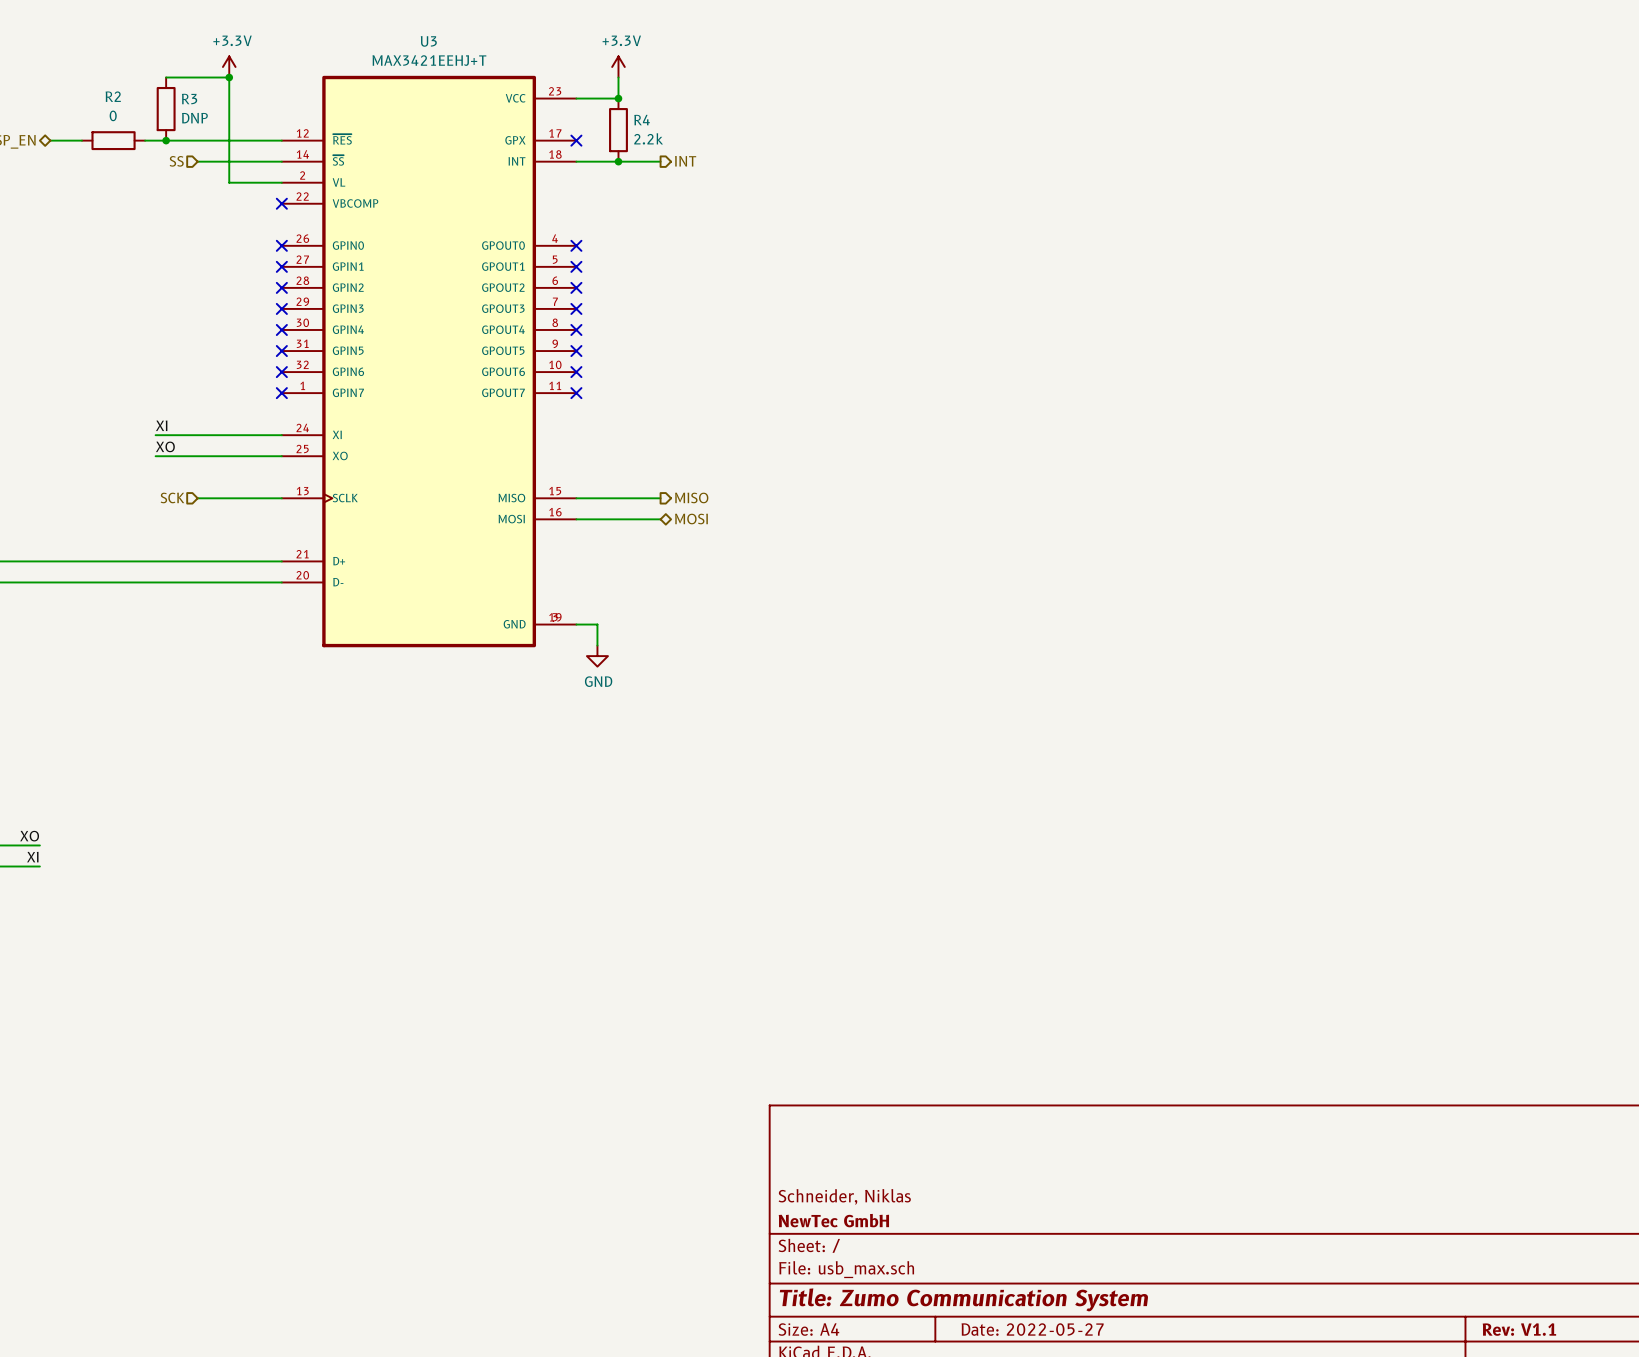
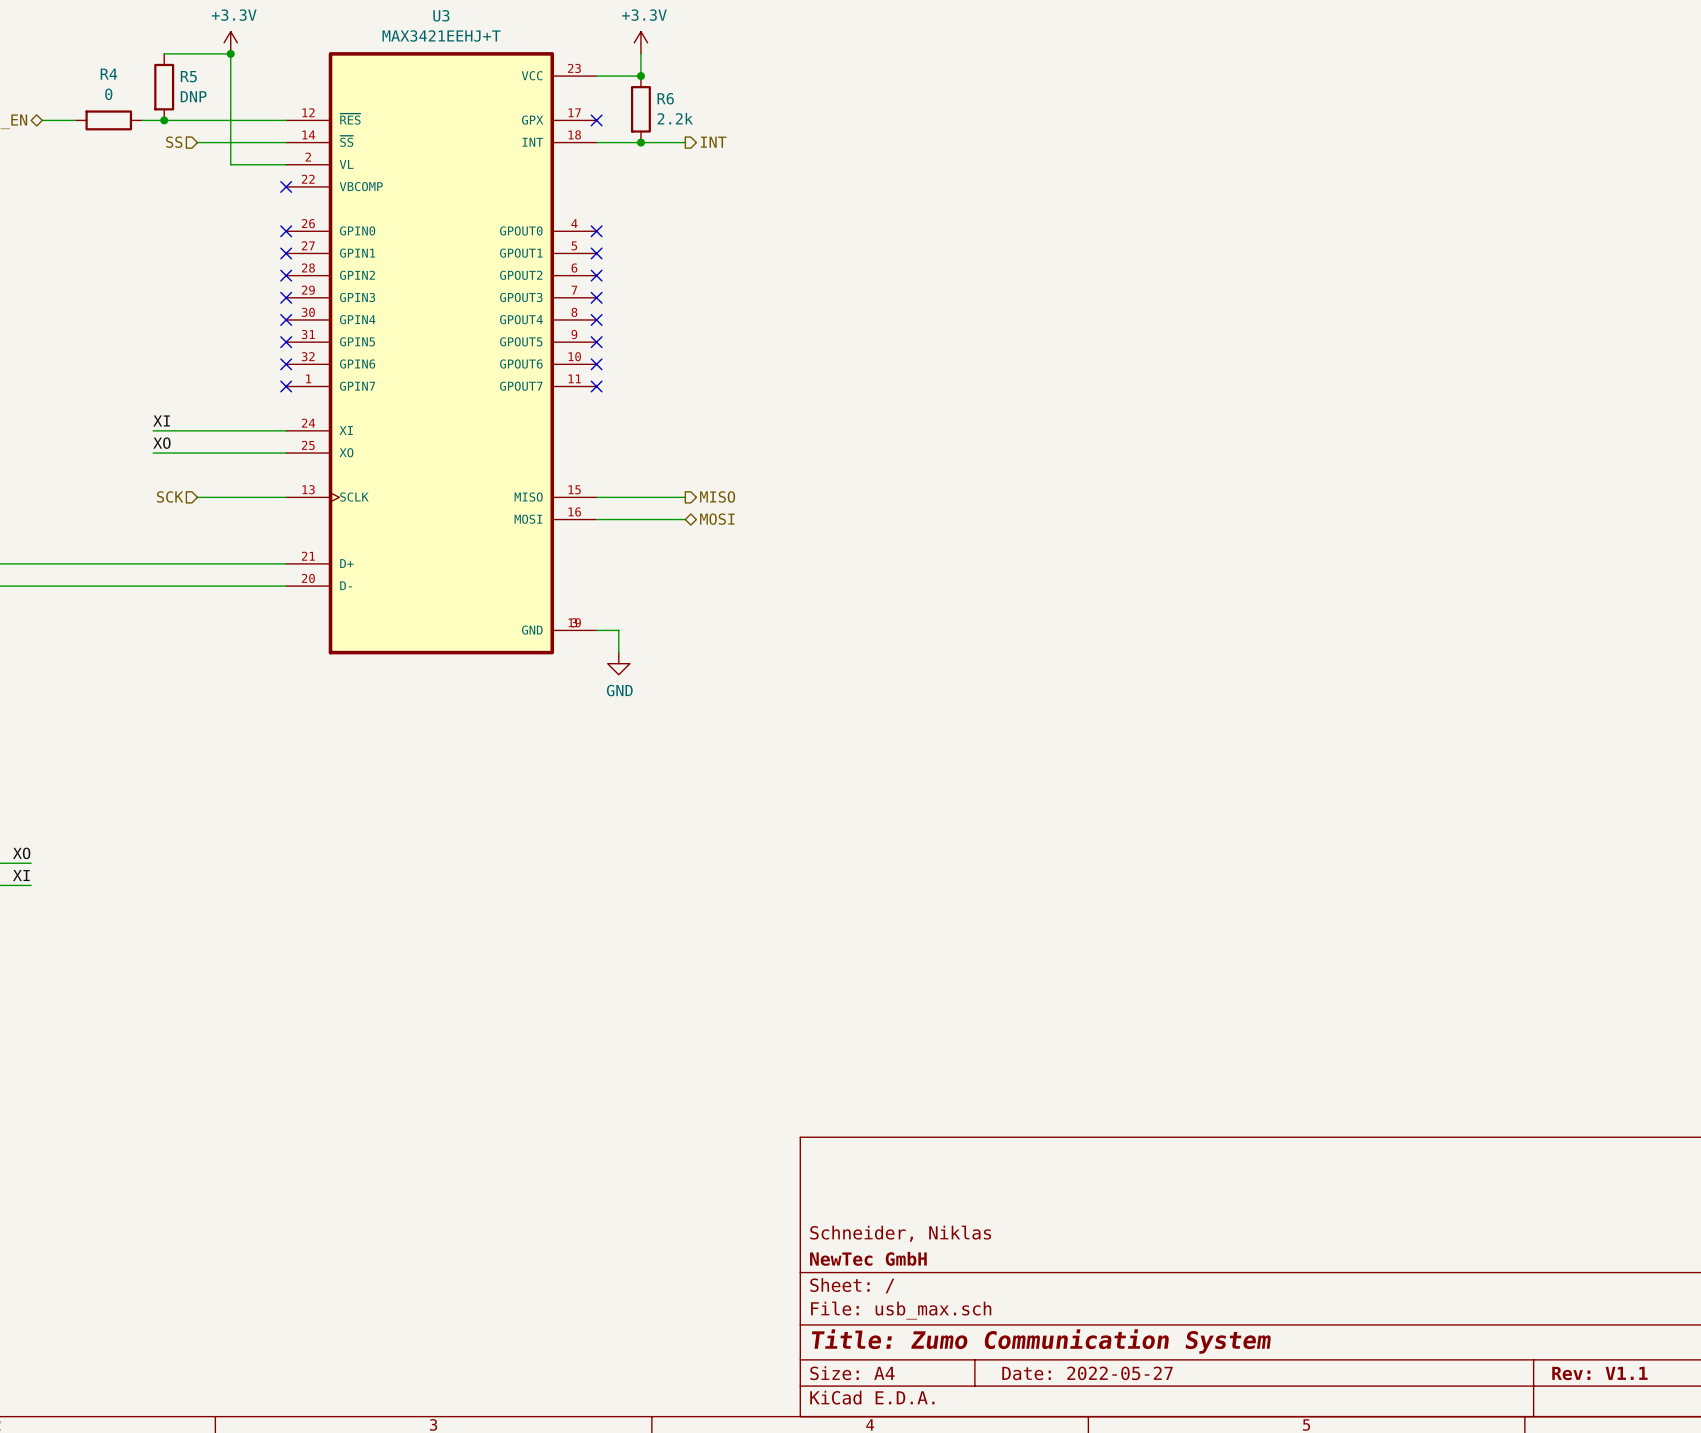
R2 name: R2 (113, 96) -> R4 (108, 74)
R3 name: R3 (189, 99) -> R5 (188, 76)
R4 name: R4 (642, 120) -> R6 (665, 98)

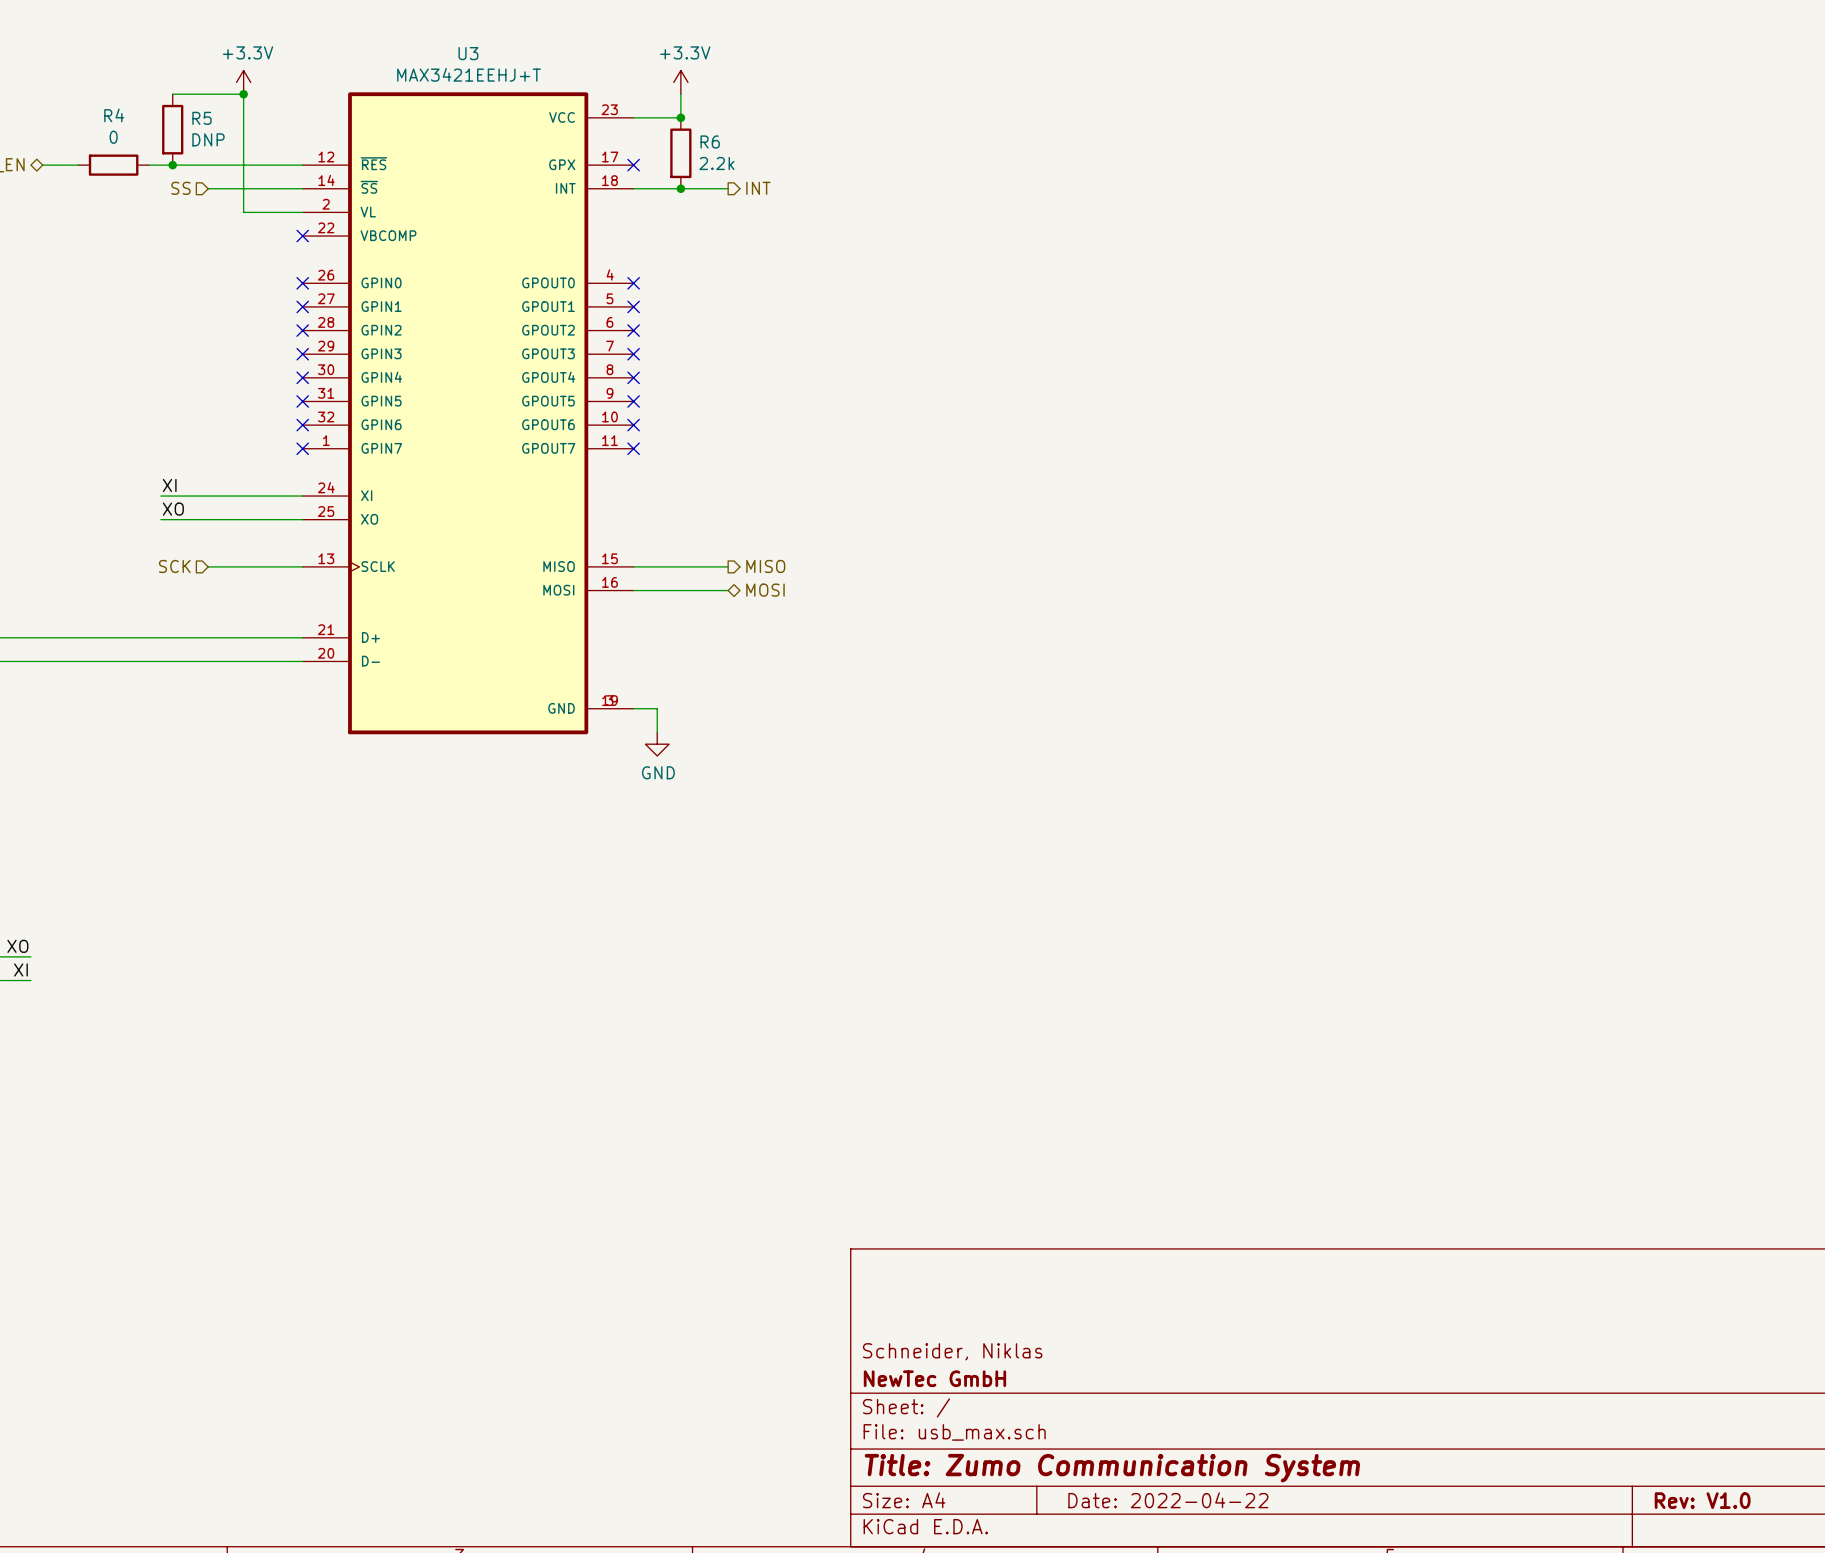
title block: Date: 2022-05-27 (1087, 1373) -> Date: 2022-04-22 (1168, 1500)
title block: Rev: V1.1 (1599, 1373) -> Rev: V1.0 (1702, 1500)

